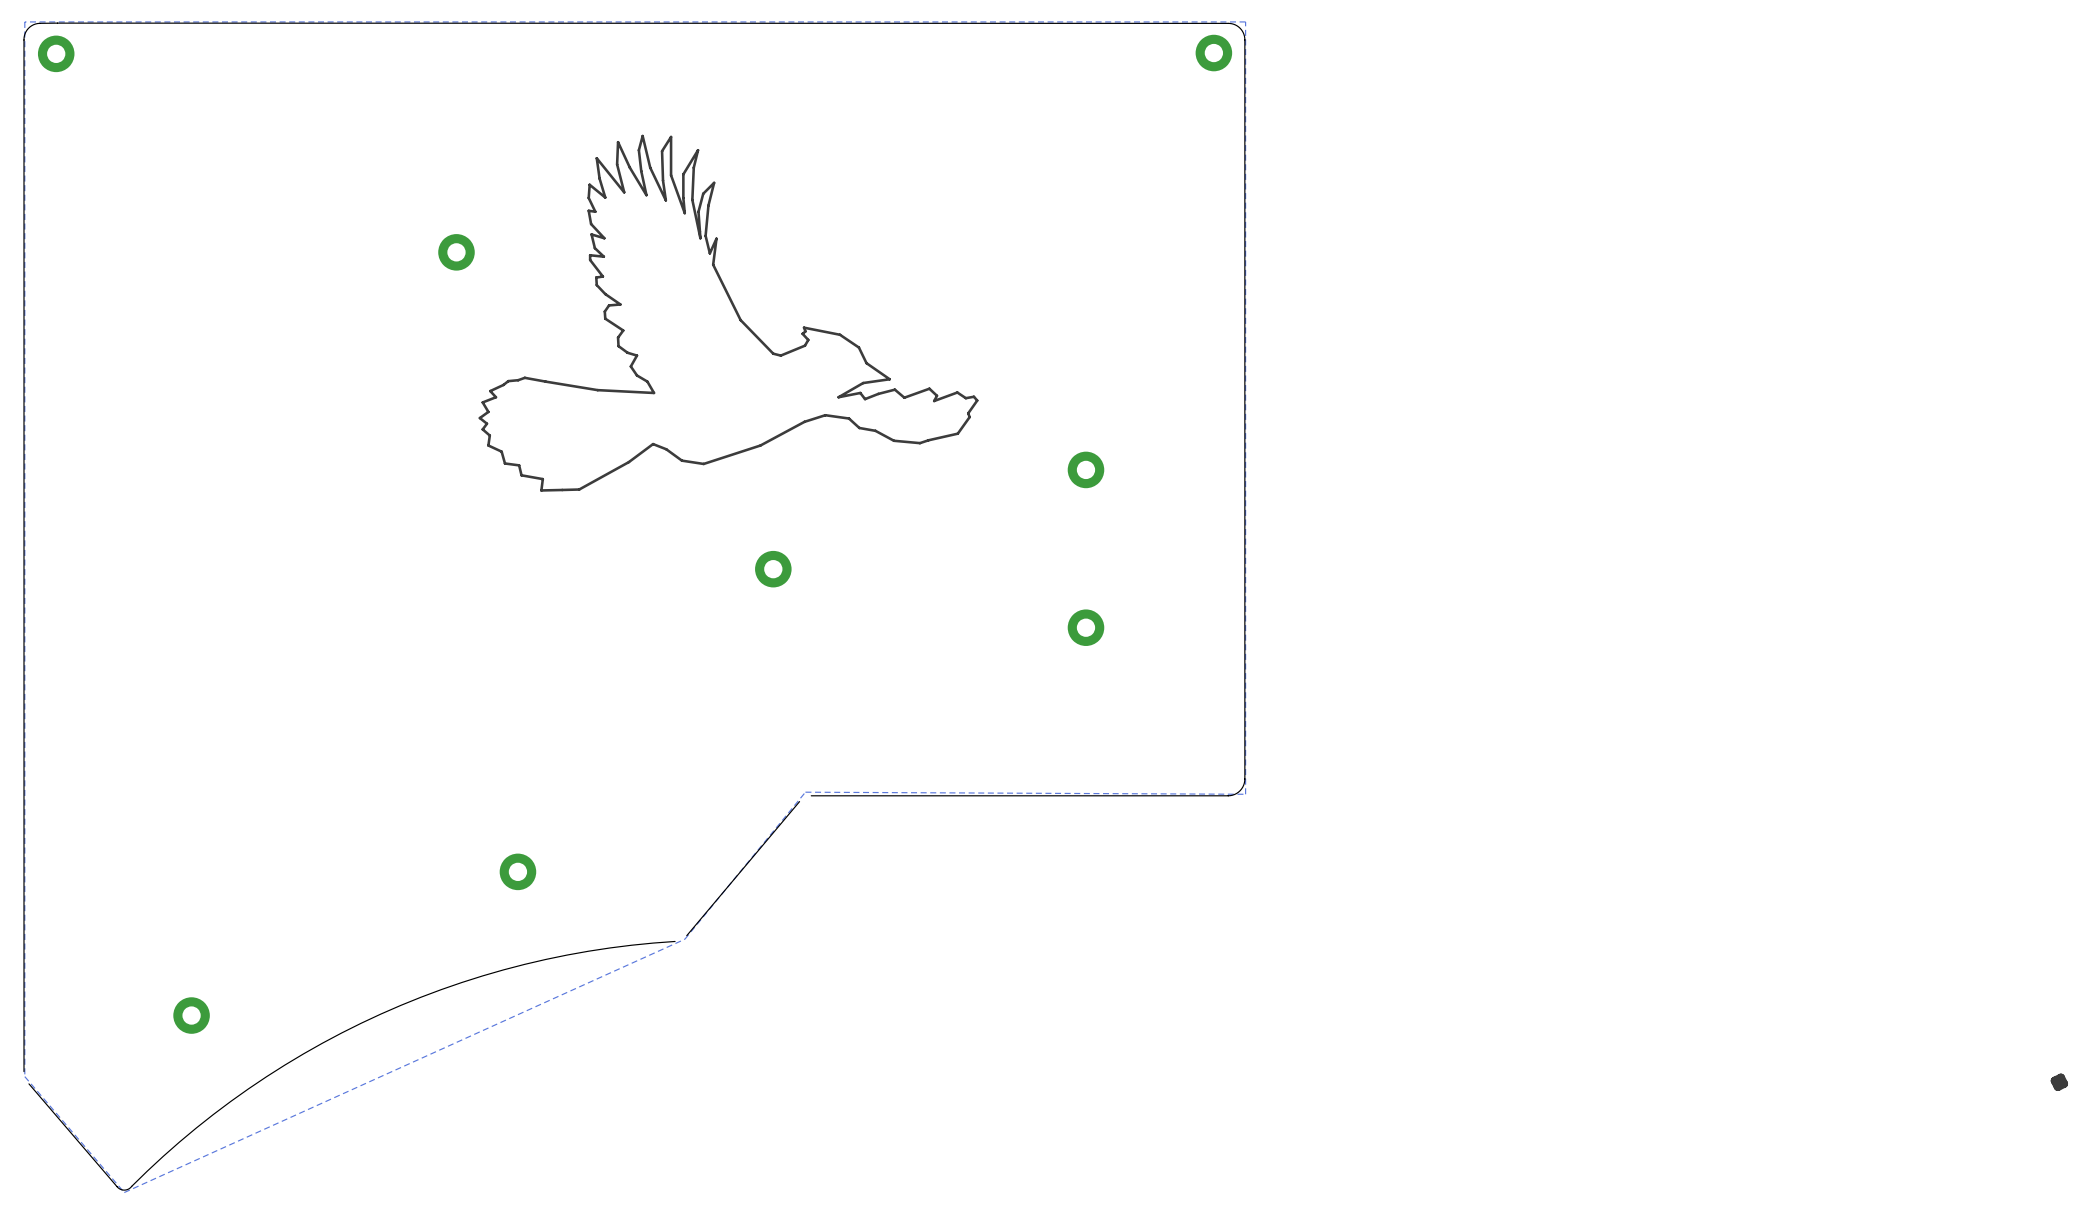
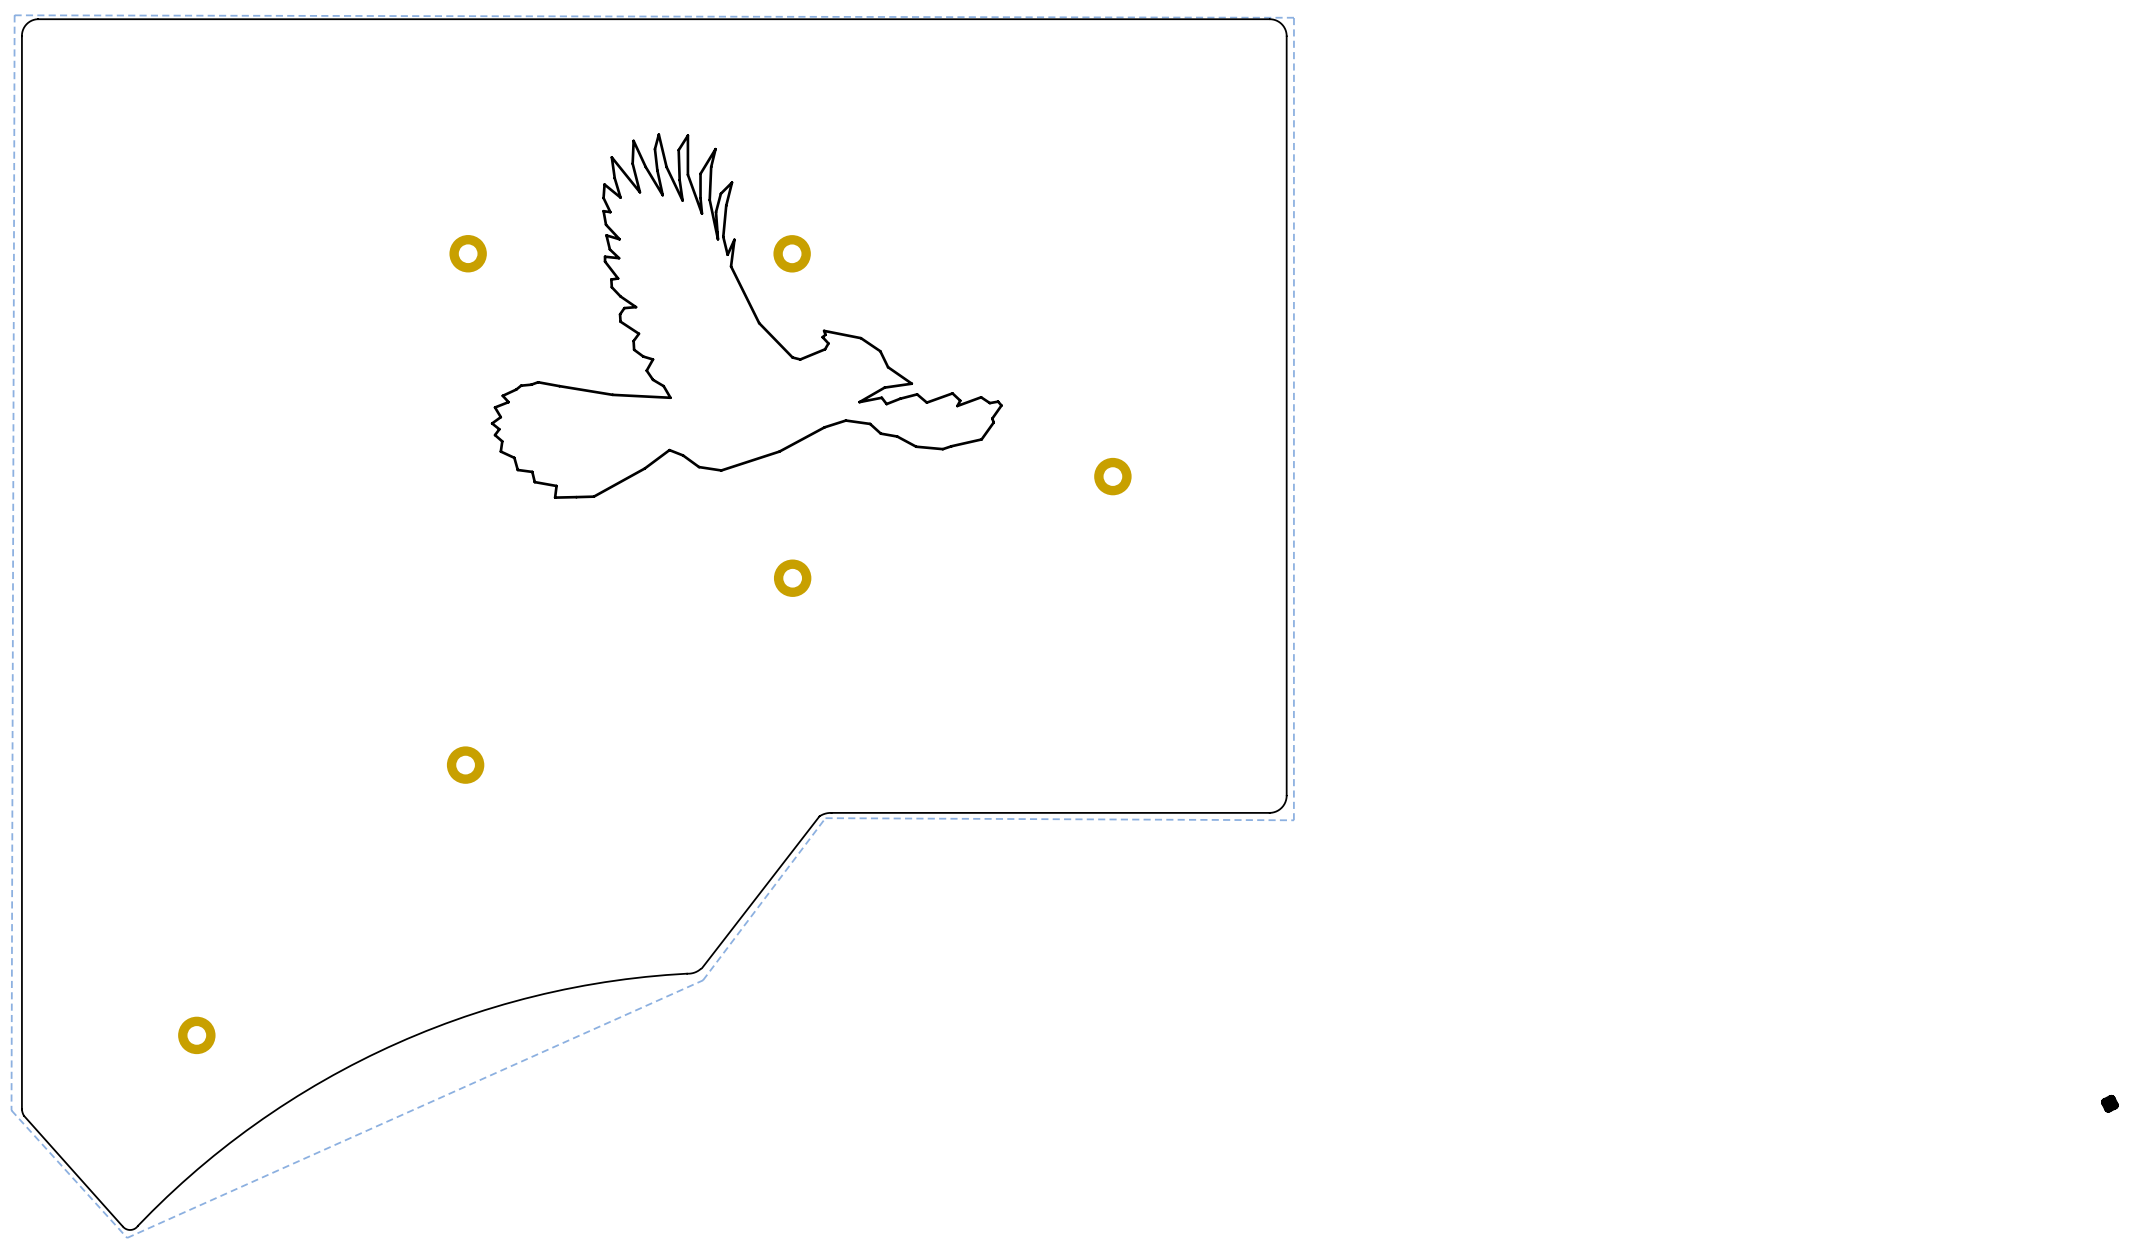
zone outline: (1245, 21) (1245, 794) (805, 792) (684, 939) (124, 1192) (24, 1076) (24, 21) (1245, 21) -> (14, 15) (1293, 17) (1293, 820) (825, 818) (703, 980) (127, 1237) (11, 1110) (14, 15)
part: (56, 53) -> none
part: (1213, 53) -> none
part: none -> (792, 253)
part: (1085, 627) -> none
board edge: (811, 795) (1228, 795) (1236, 793) (1242, 787) (1244, 778) (1244, 39) (1240, 28) (1228, 23) (35, 24) (27, 30) (23, 39) (23, 1071) -> none
board edge: (799, 801) (686, 935) -> none
part position: (517, 871) -> (465, 765)
board edge: (675, 941) (588, 951) (524, 964) (461, 982) (380, 1014) (322, 1043) (248, 1088) (196, 1128) (126, 1189) (117, 1187) (28, 1083) -> none
board edge: none -> (701, 968) (690, 973) (605, 982) (524, 998) (464, 1016) (388, 1047) (333, 1075) (280, 1107) (246, 1130) (197, 1169) (135, 1228) (129, 1229) (122, 1226)
board edge: none -> (701, 968) (819, 816) (825, 813) (1269, 812) (1278, 810) (1284, 804) (1286, 795) (1286, 36) (1284, 27) (1277, 20) (1269, 19) (31, 20) (25, 26) (21, 36) (21, 1109) (23, 1115) (122, 1226)

